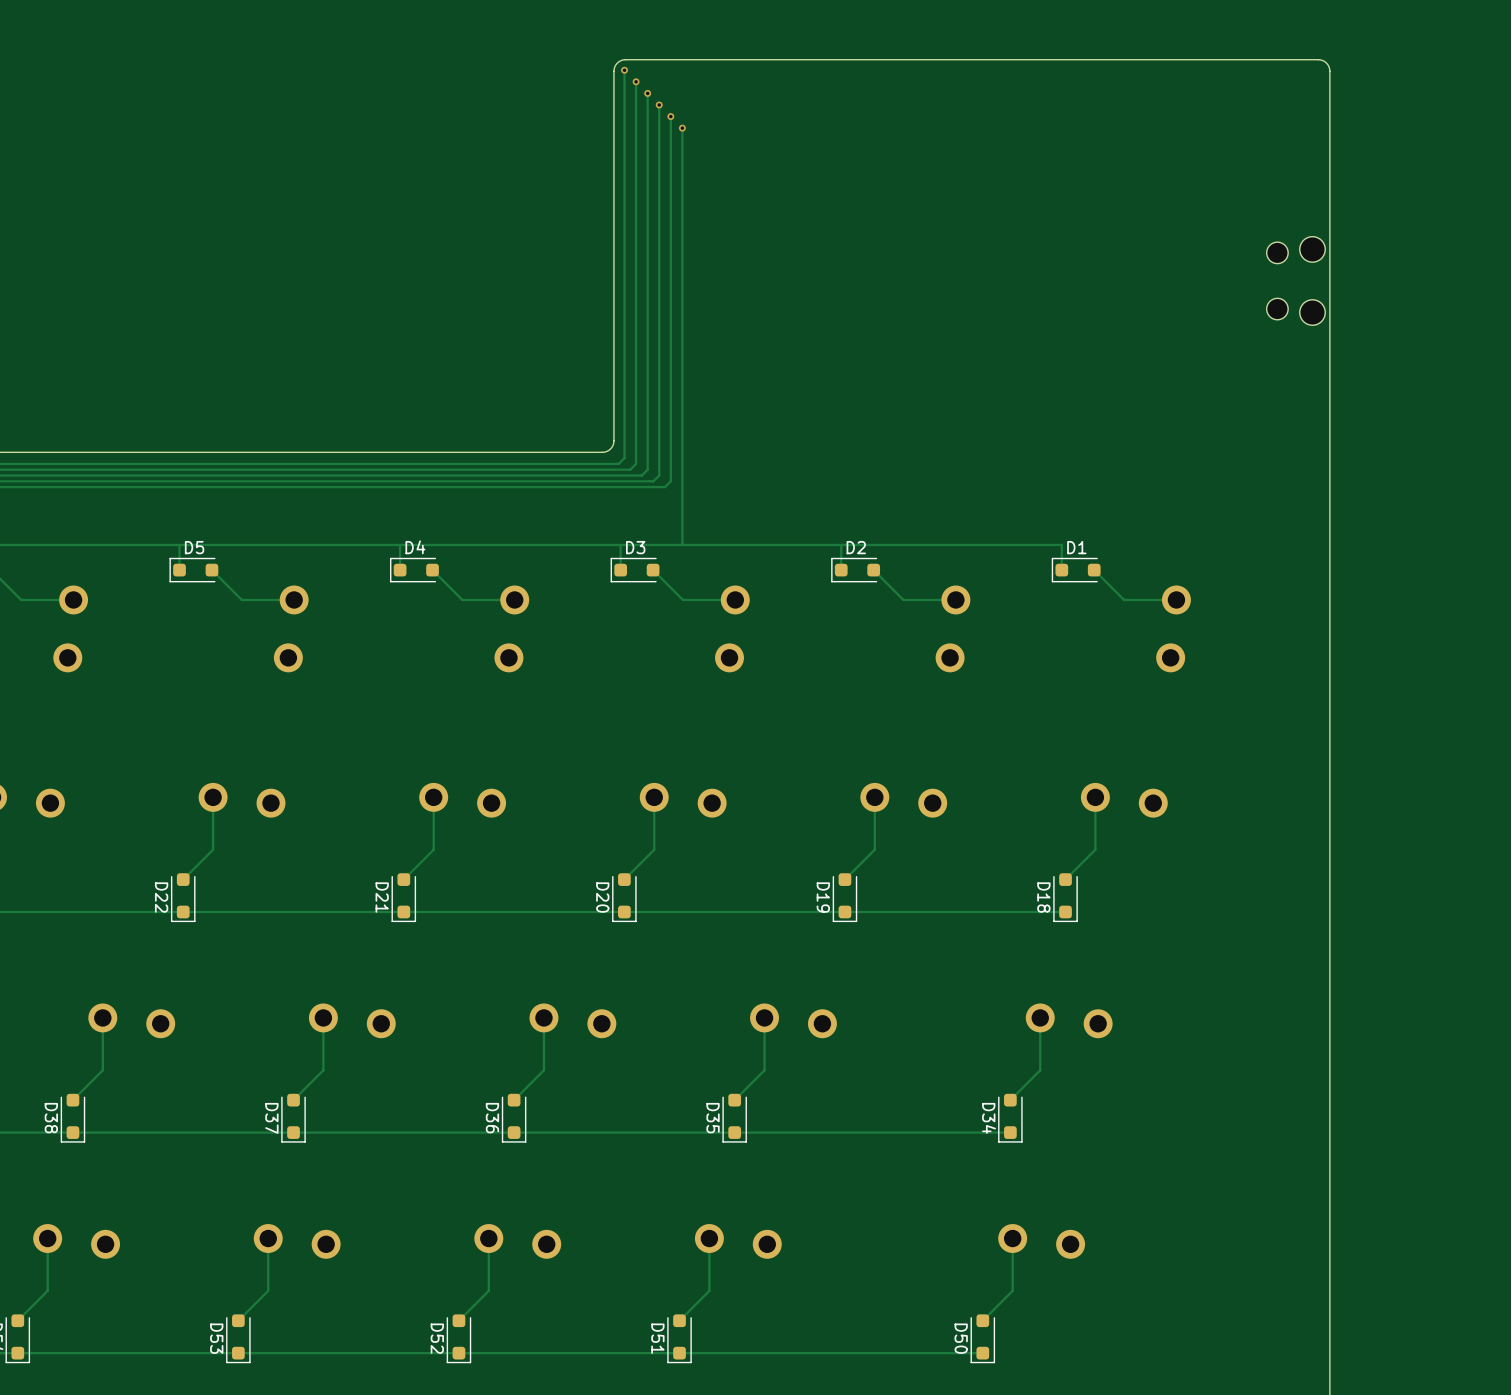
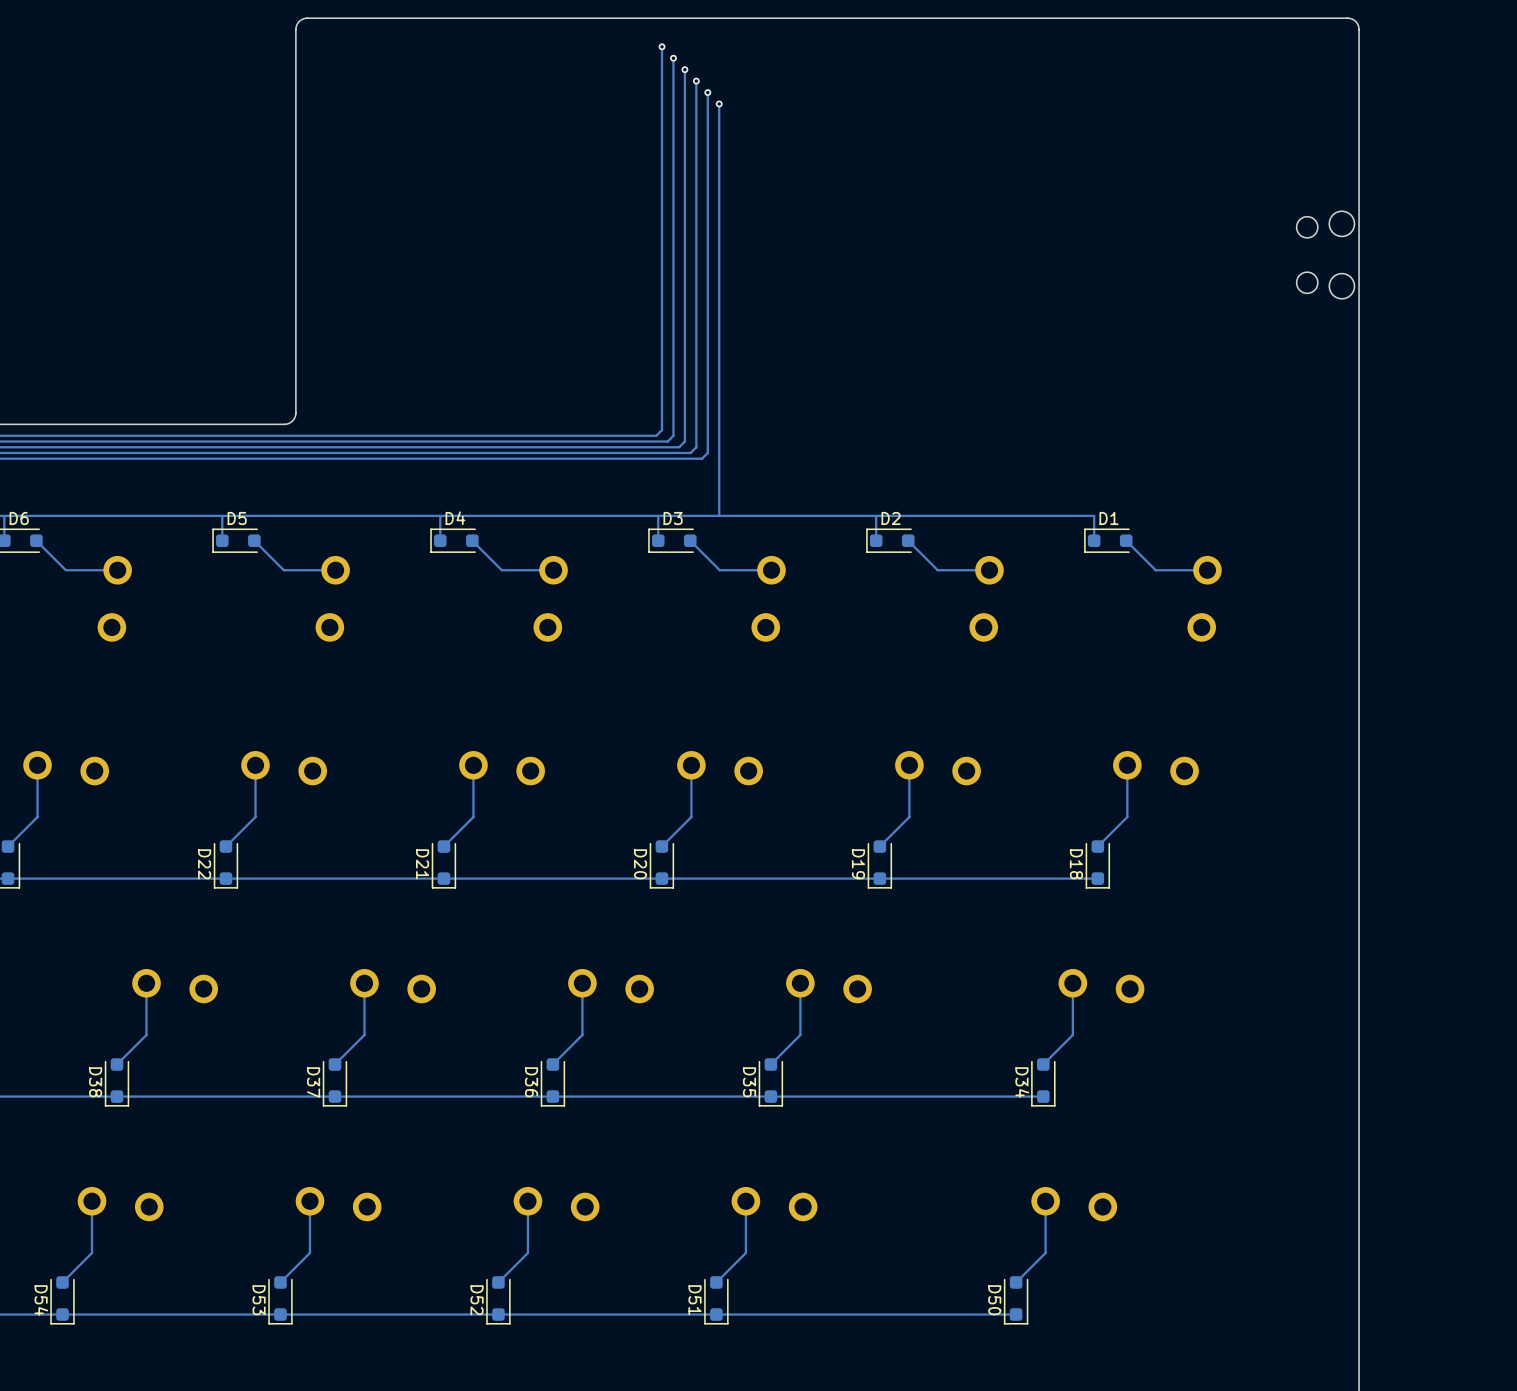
board edge: (1329, 71) (1326, 63) (1318, 59) (621, 60) (616, 64) (613, 71) (613, 440) (610, 448) (602, 452) (242, 452) -> (1359, 47) (1358, 25) (1353, 19) (1347, 18) (302, 19) (297, 23) (295, 29) (295, 412) (292, 421) (284, 424)

